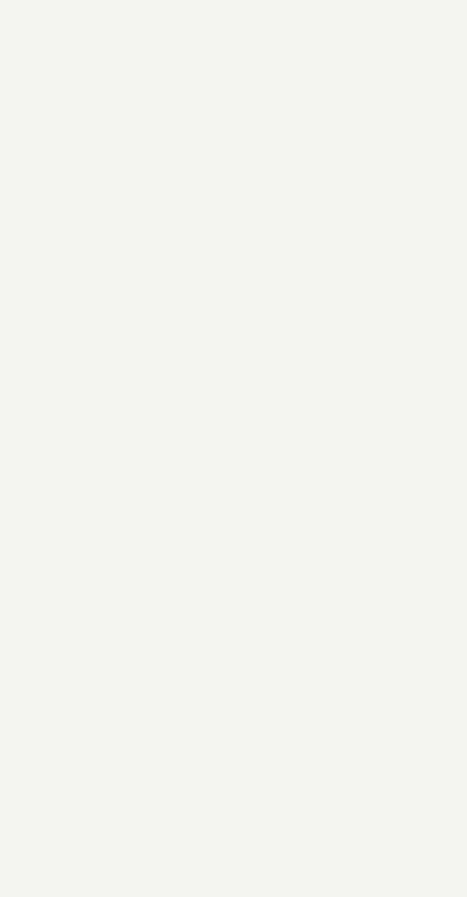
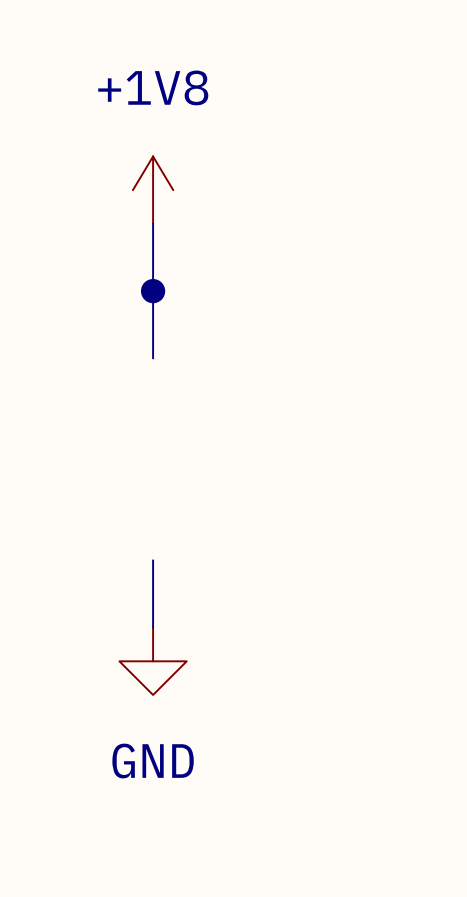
power symbol: none -> +1V8 (153, 190)
wire: none -> (153, 223) (153, 358)
junction: none -> (153, 291)
wire: none -> (153, 560) (153, 627)
power symbol: none -> GND (153, 661)

